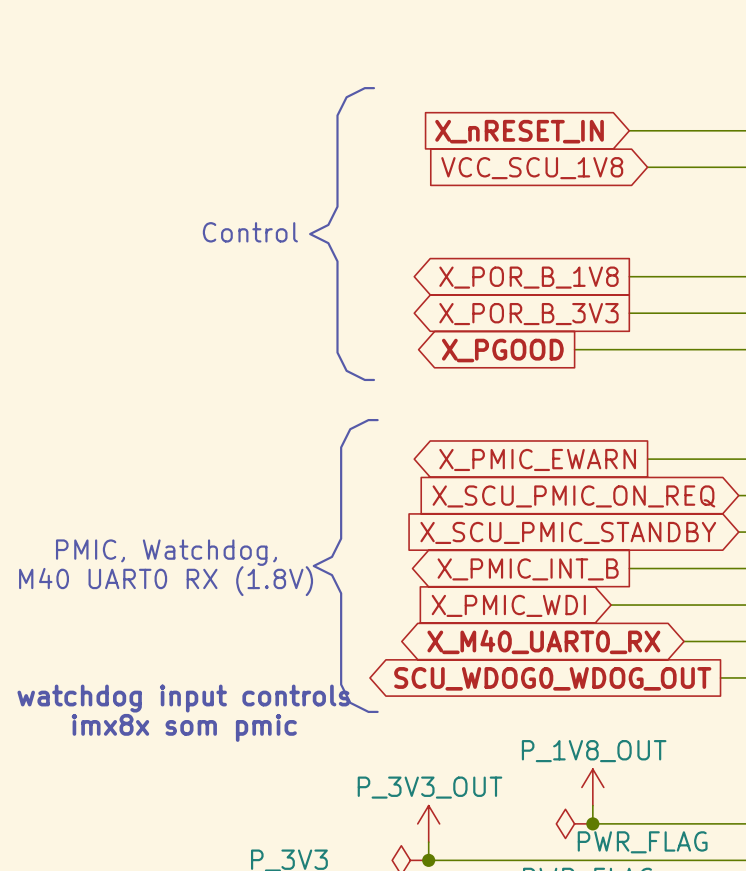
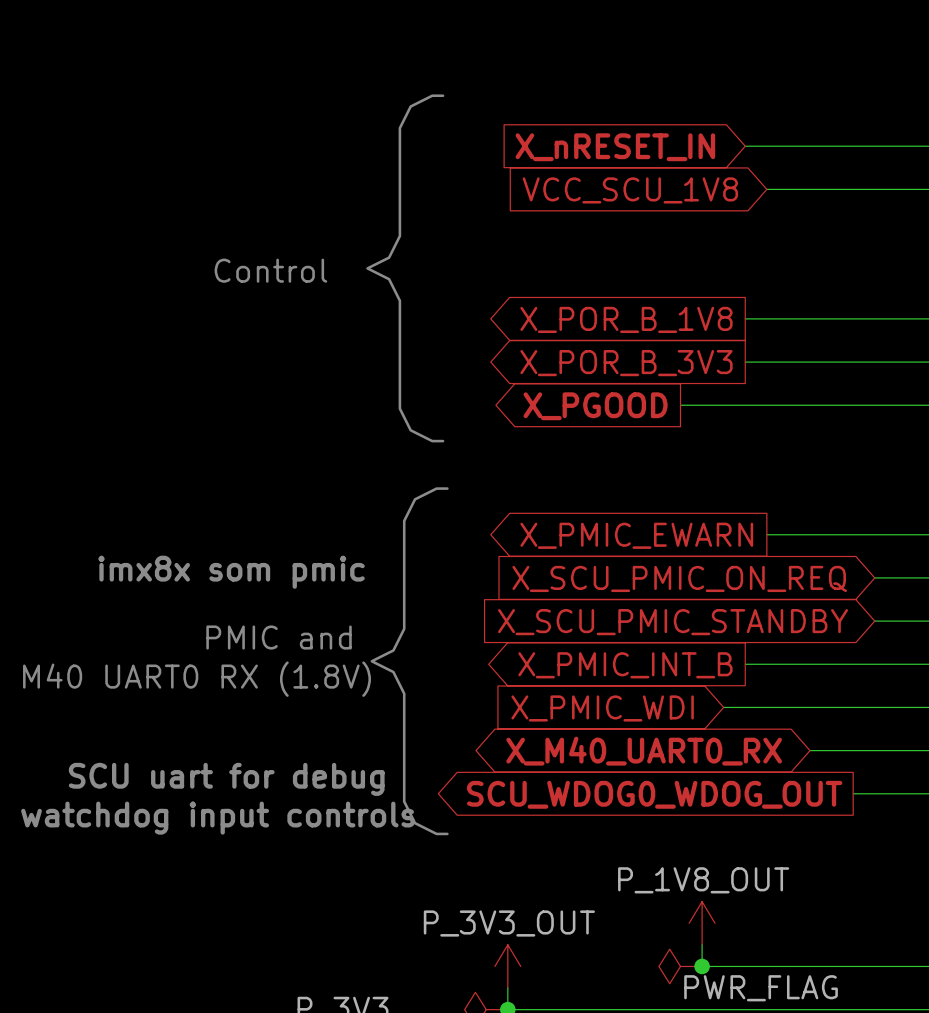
text position: Control (250, 232) -> Control (270, 270)
text: PMIC, Watchdog, (166, 552) -> PMIC and (279, 637)
text: none -> SCU uart for debug (226, 779)
text position: imx8x som pmic (184, 727) -> imx8x som pmic (231, 572)

